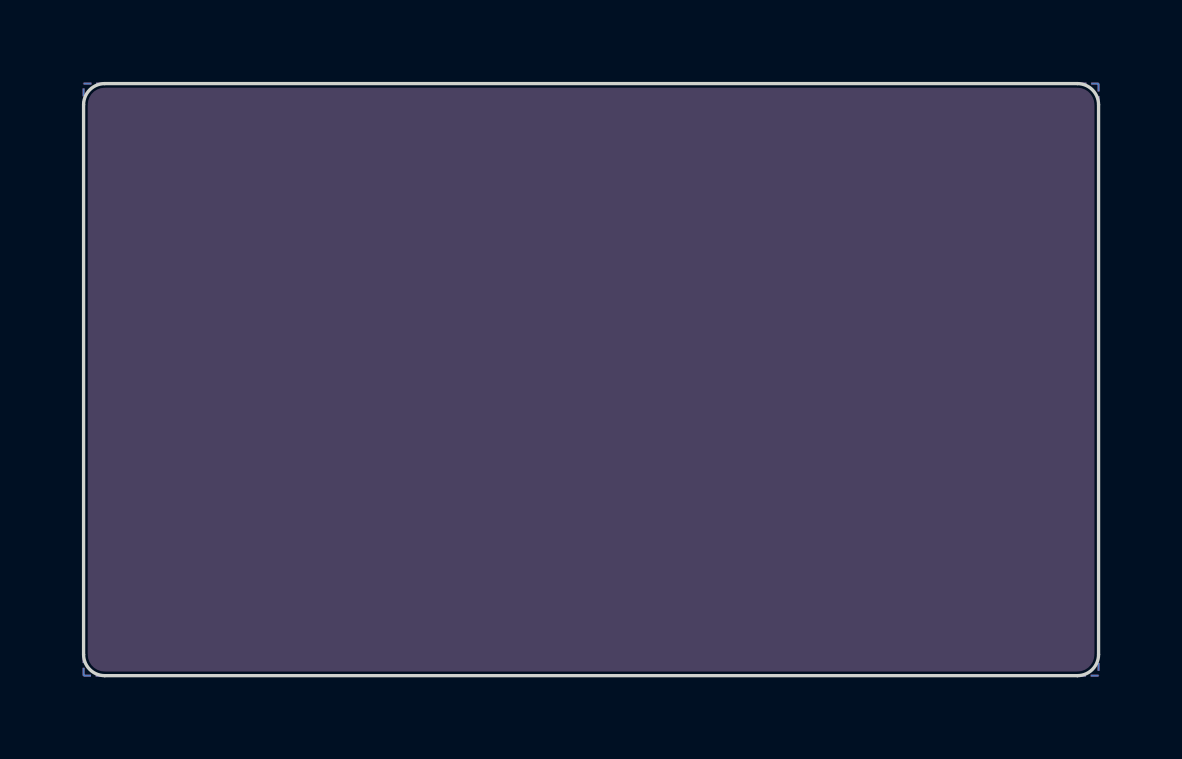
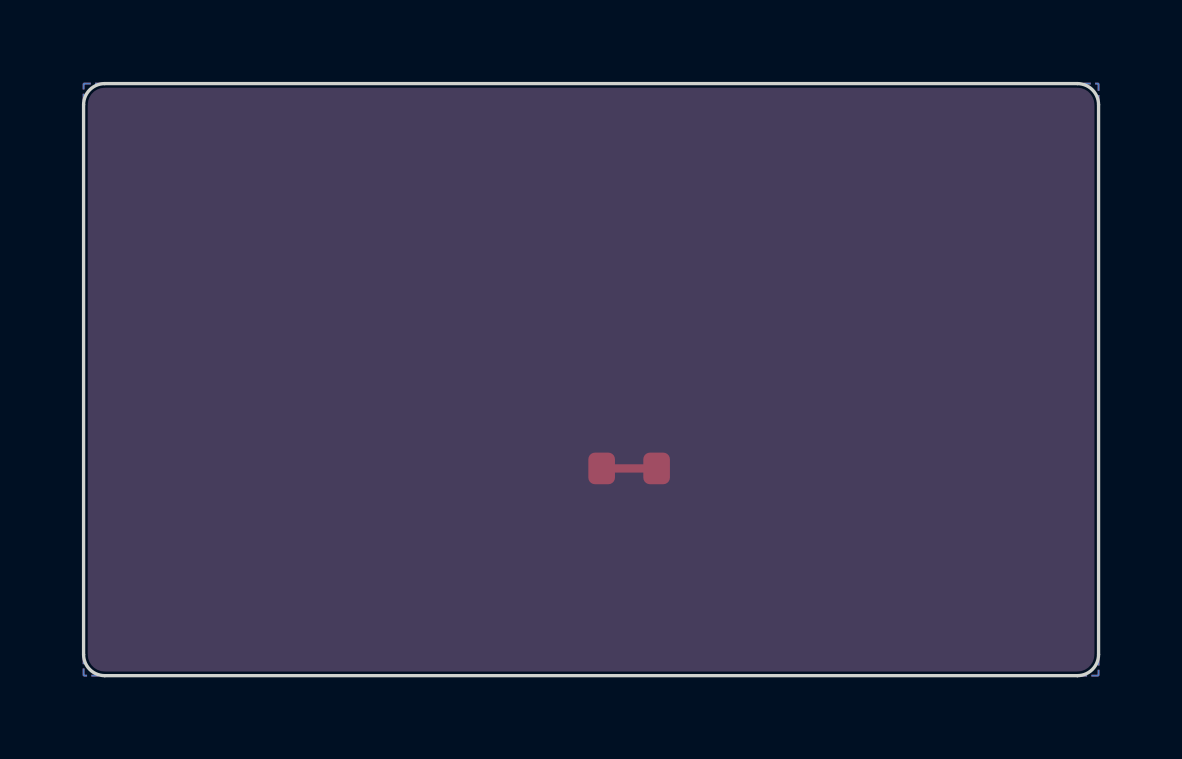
part: none -> (629, 468)
top track: none -> (656, 468) (601, 468)

